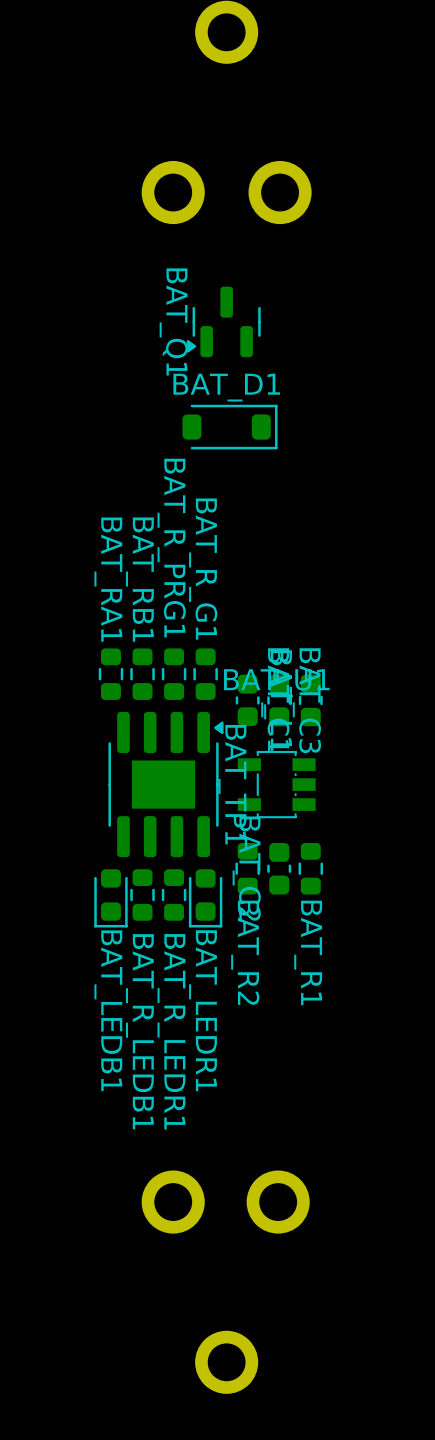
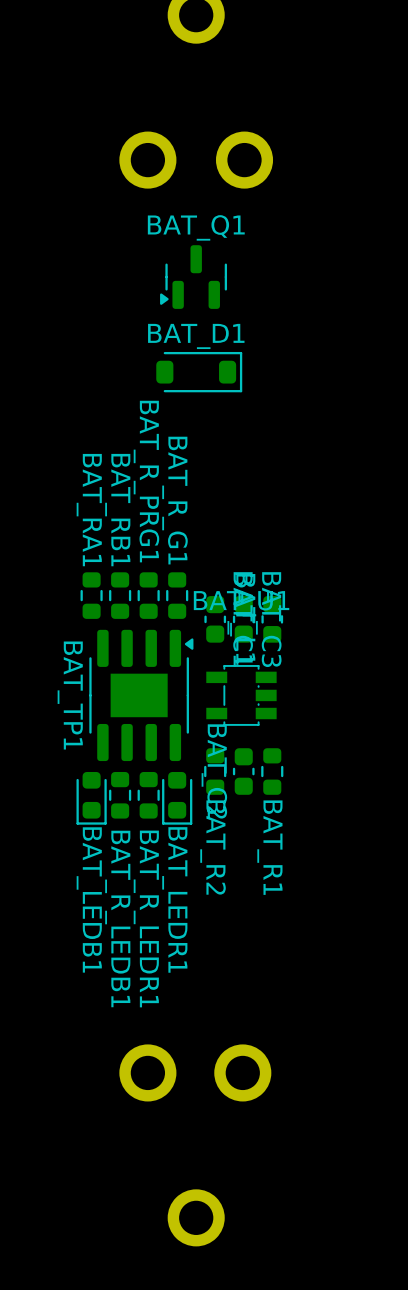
BAT_Q1 name rotation: 0° (173, 321) -> 90° counterclockwise (196, 227)
BAT_TP1 name position: BAT_TP1 (232, 784) -> BAT_TP1 (70, 695)

